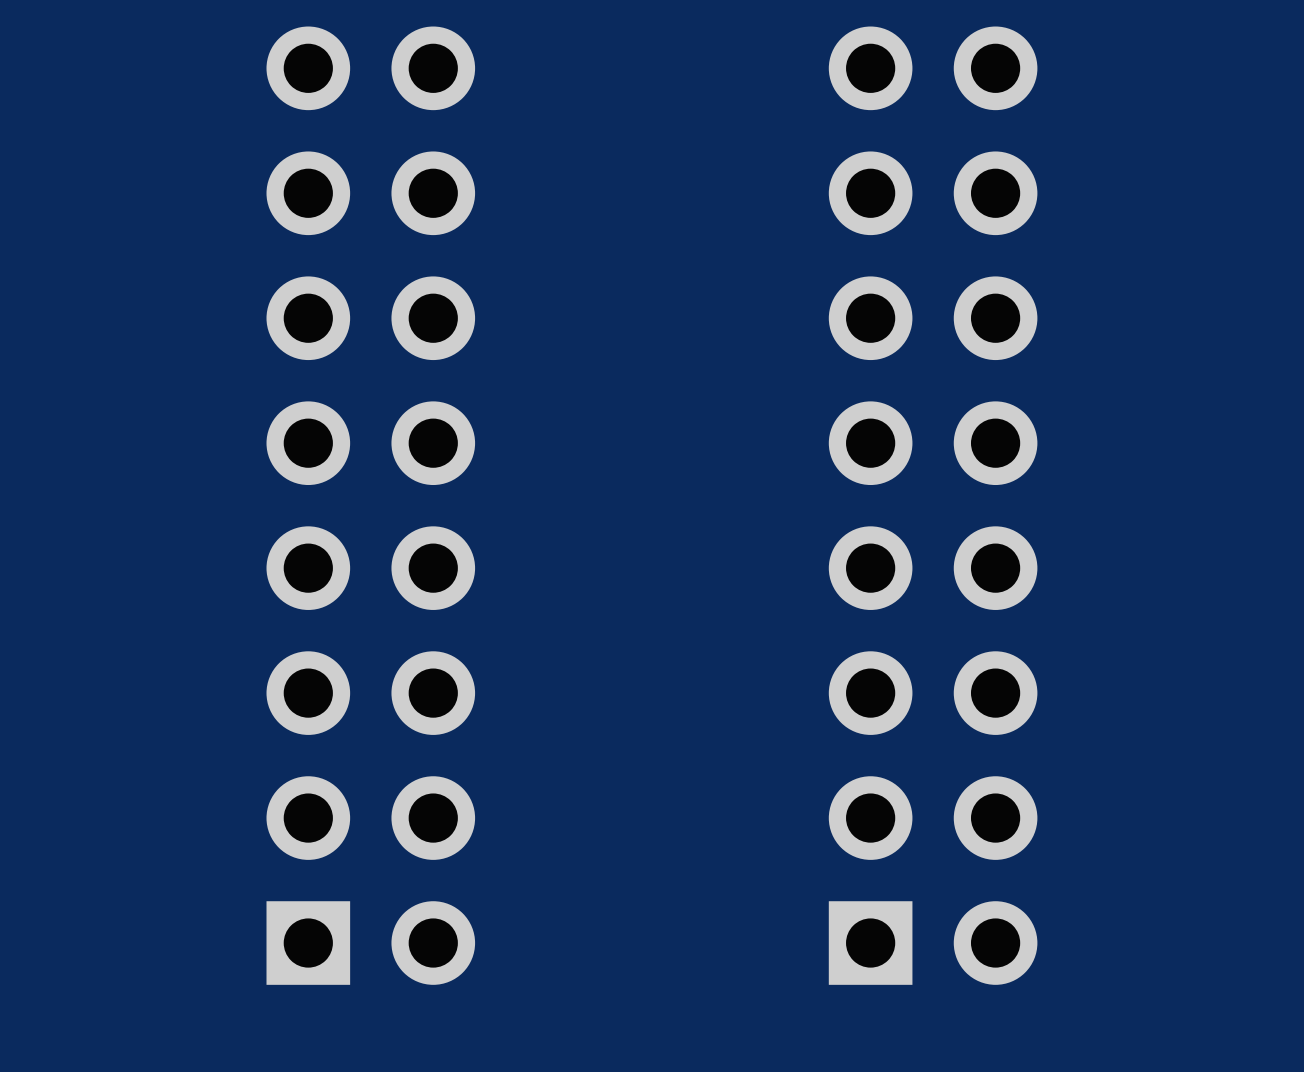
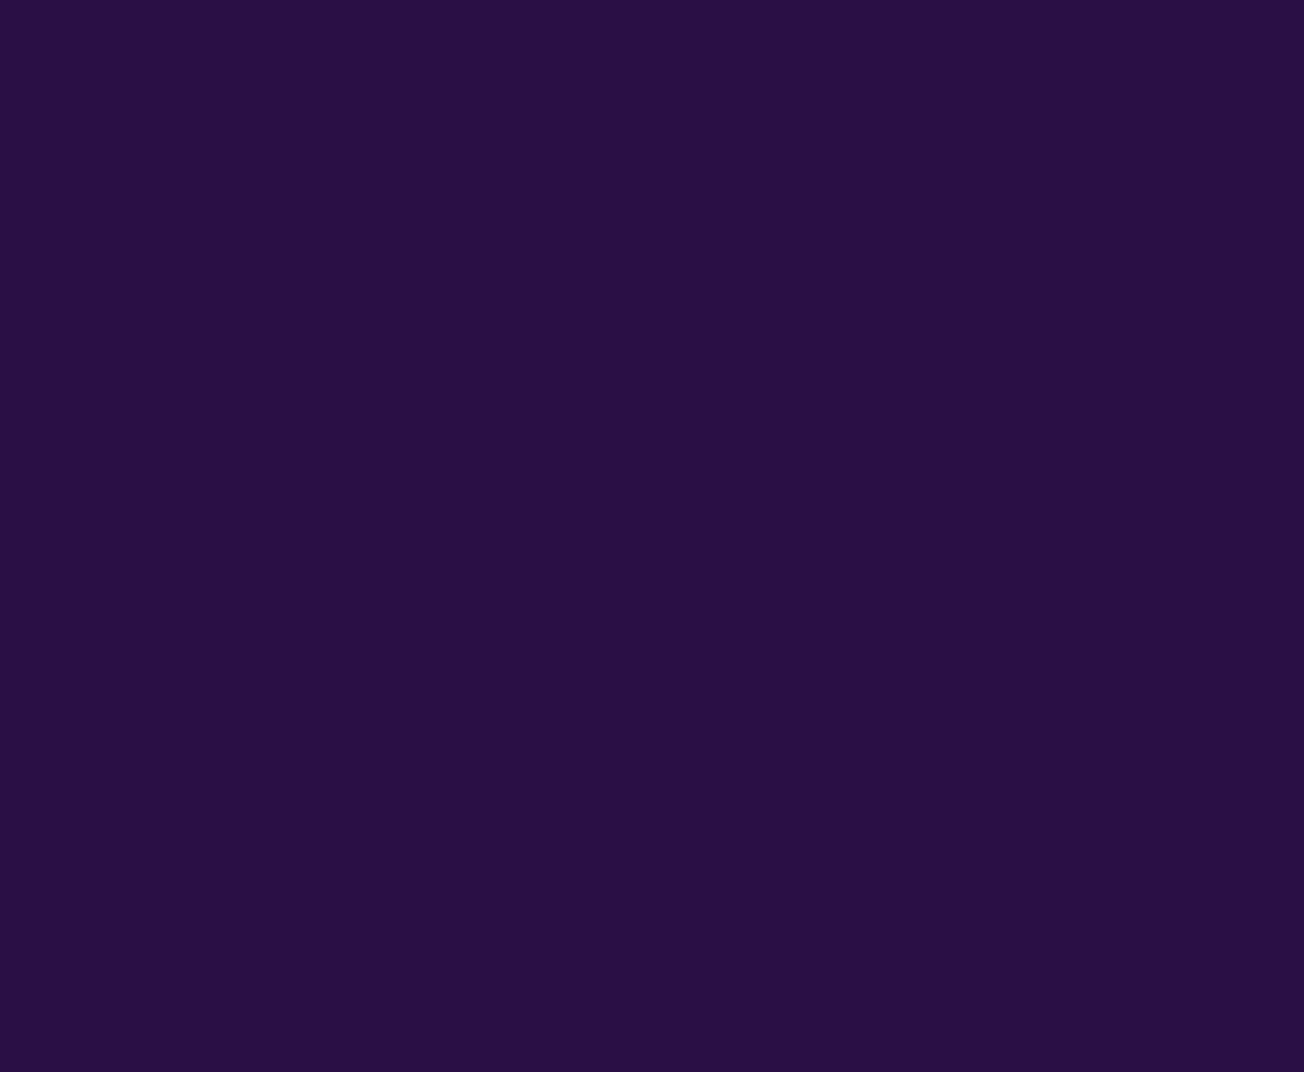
part: (370, 505) -> none
part: (933, 505) -> none

